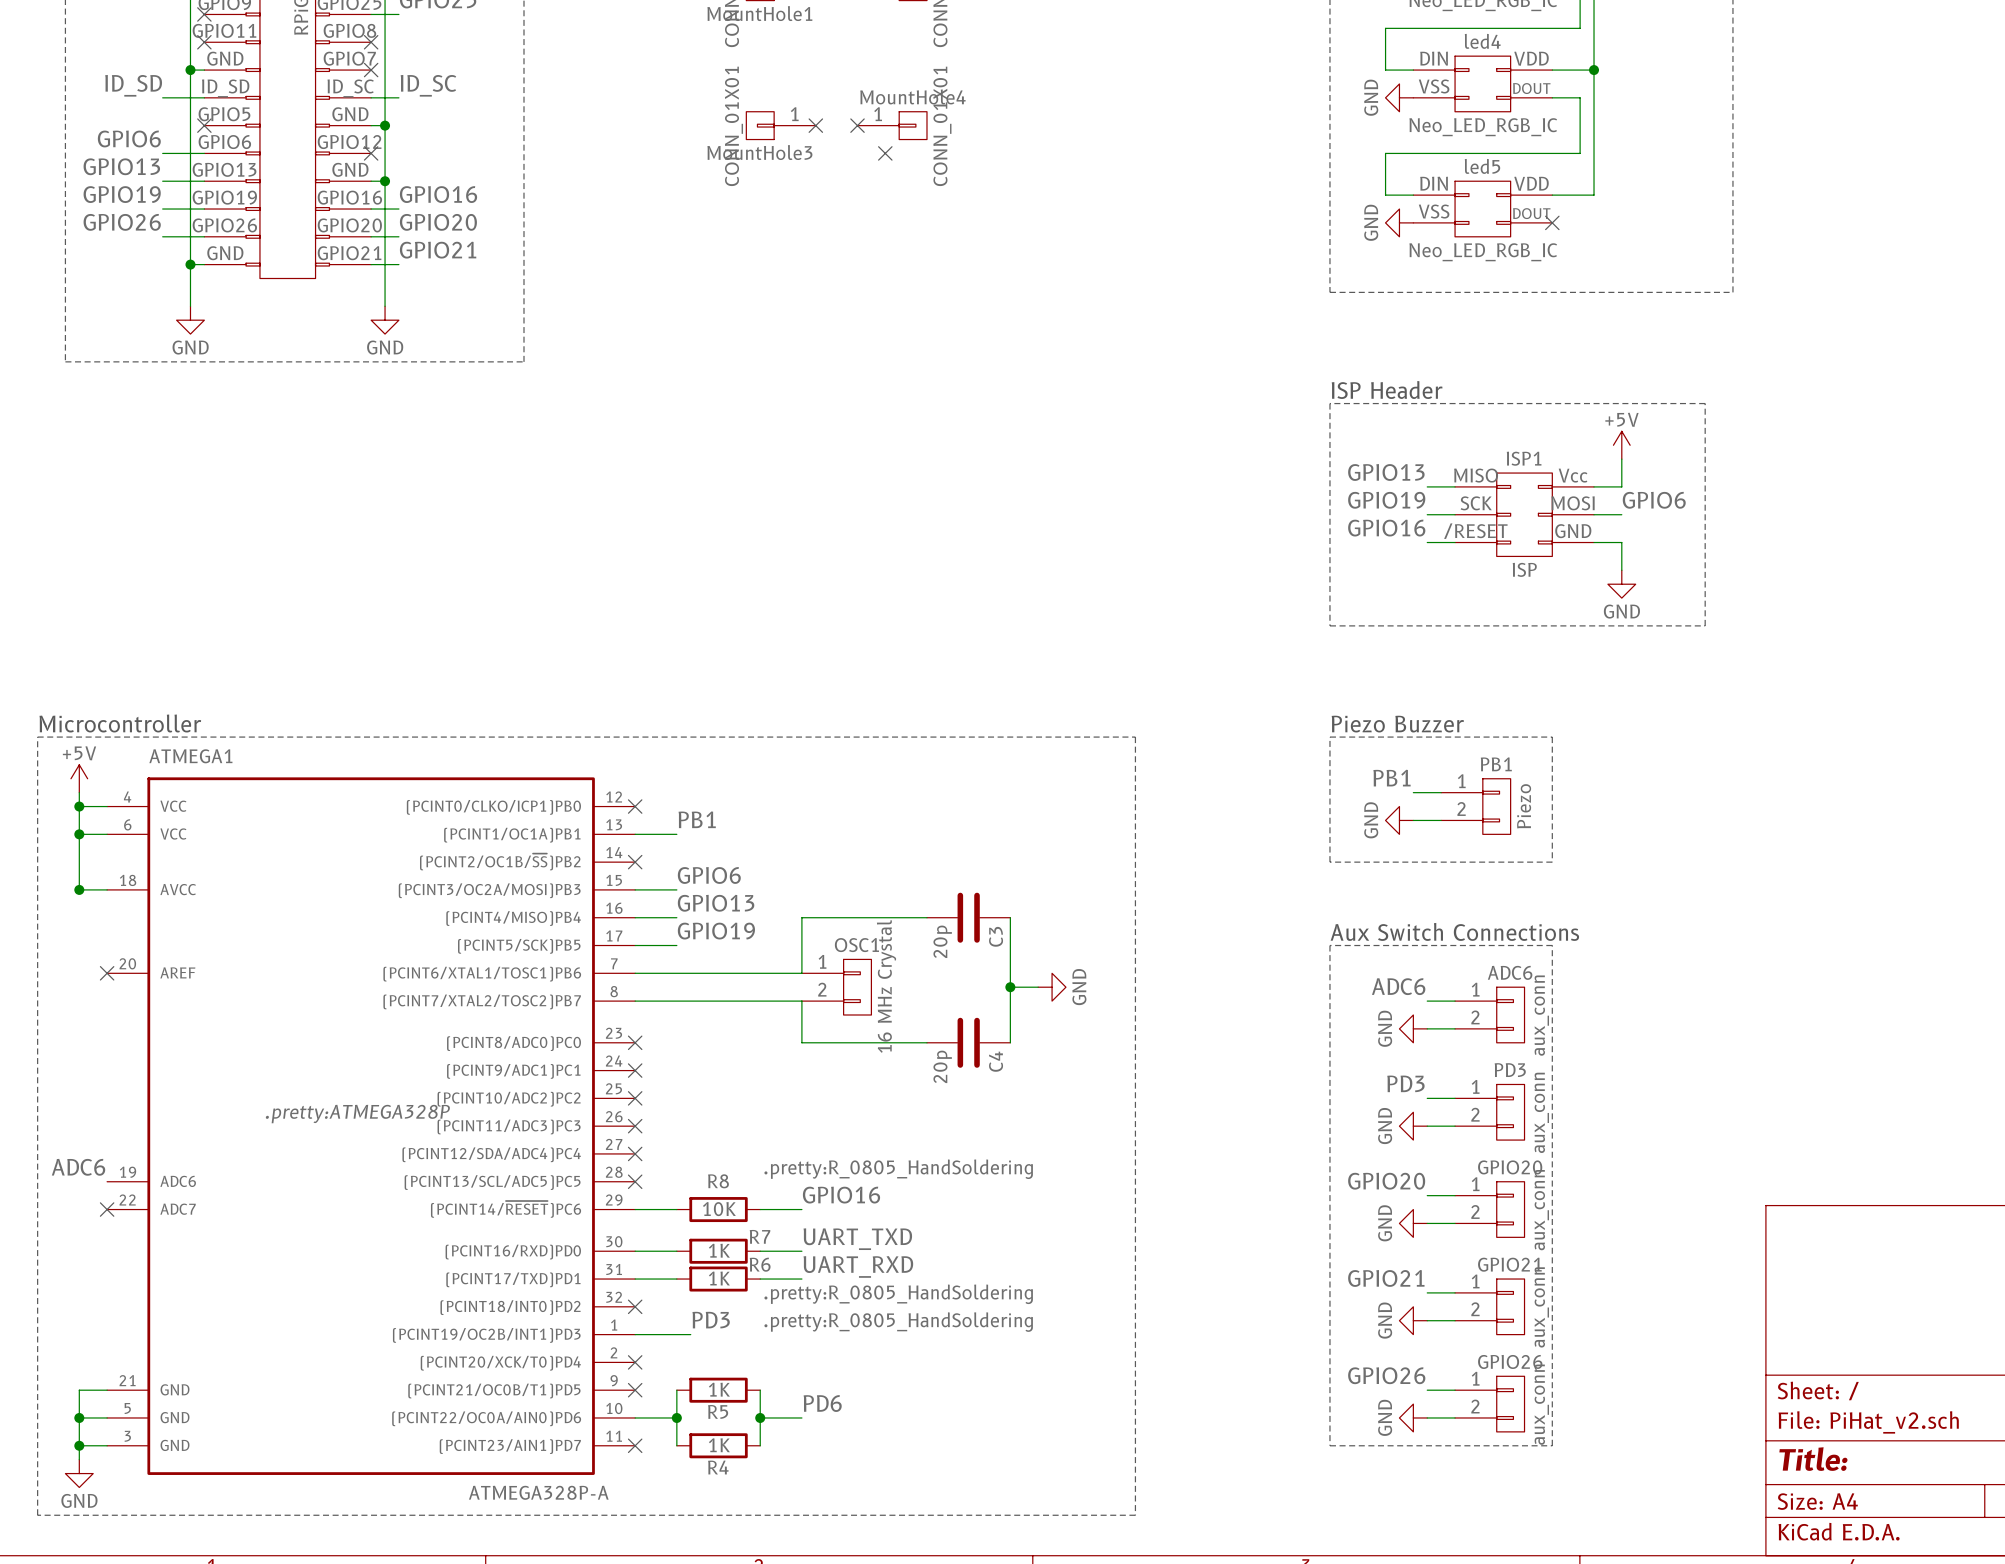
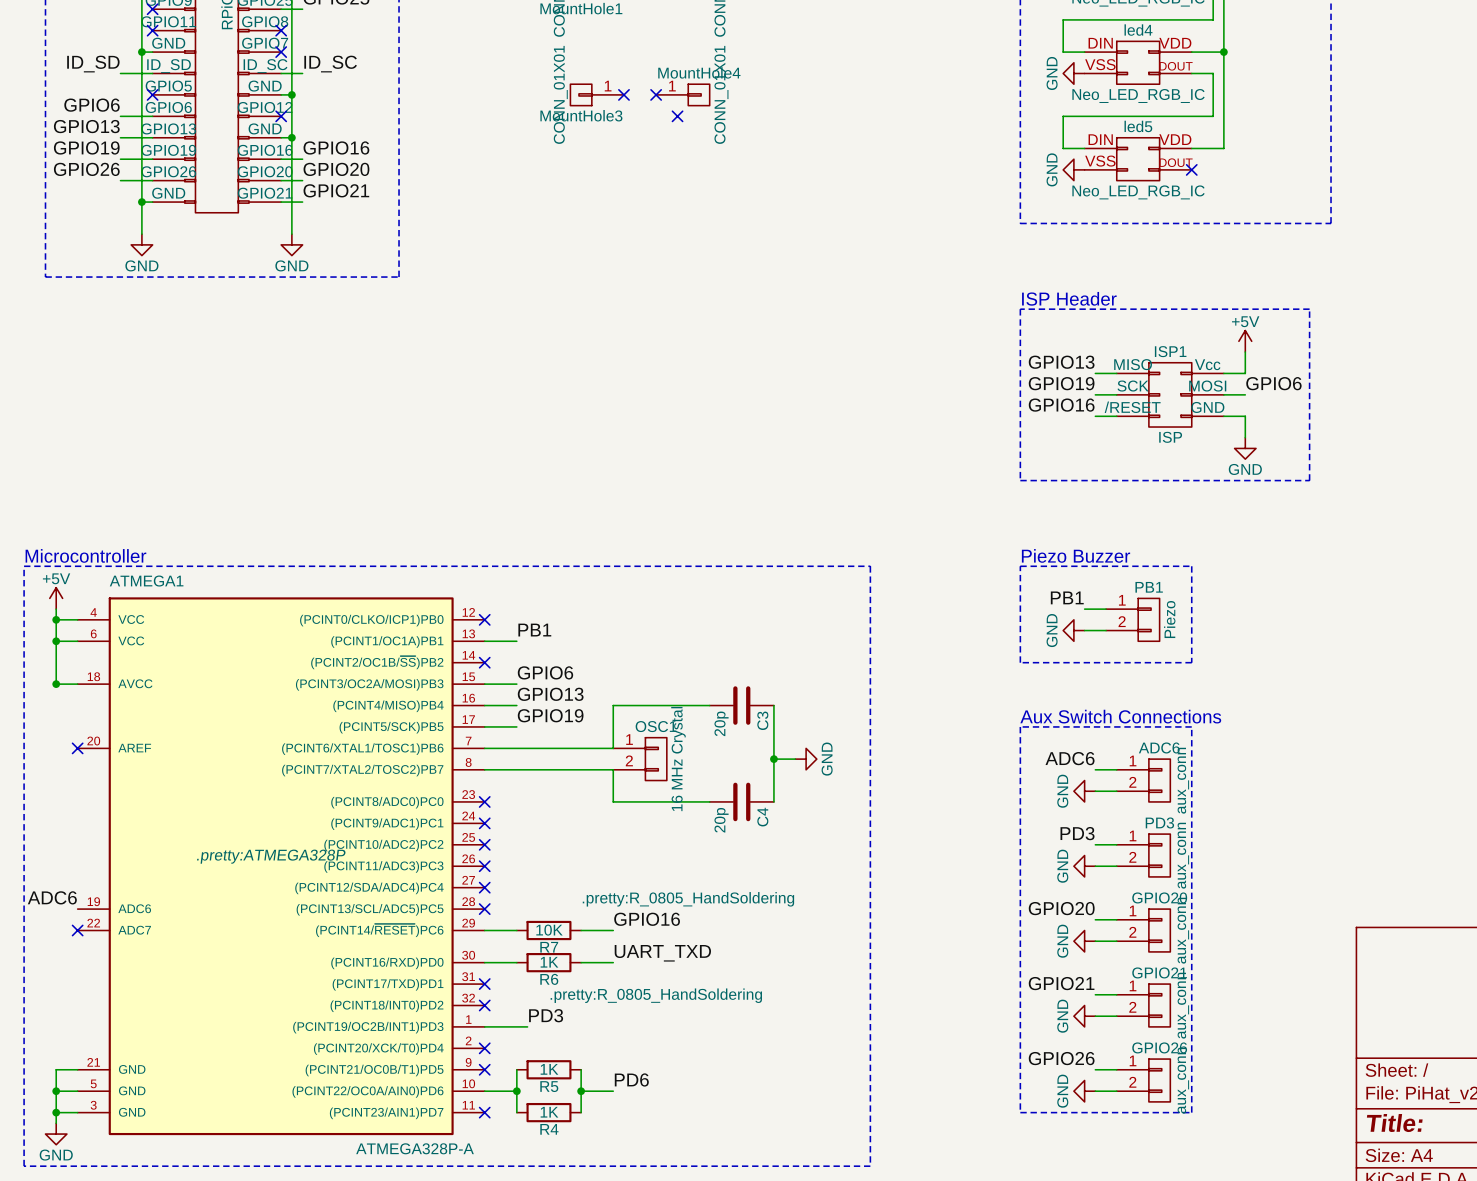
R8 name: R8 (718, 1181) -> R7 (549, 947)
R7 name: R7 (760, 1236) -> R6 (549, 979)
label: UART_RXD (858, 1266) -> none
wire: (635, 1279) (676, 1279) -> none
no-connect mark: none -> (484, 984)
R6: 1K (718, 1279) -> none
wire: (760, 1279) (801, 1279) -> none
R7 text position: .pretty:R_0805_HandSoldering (898, 1294) -> .pretty:R_0805_HandSoldering (656, 995)

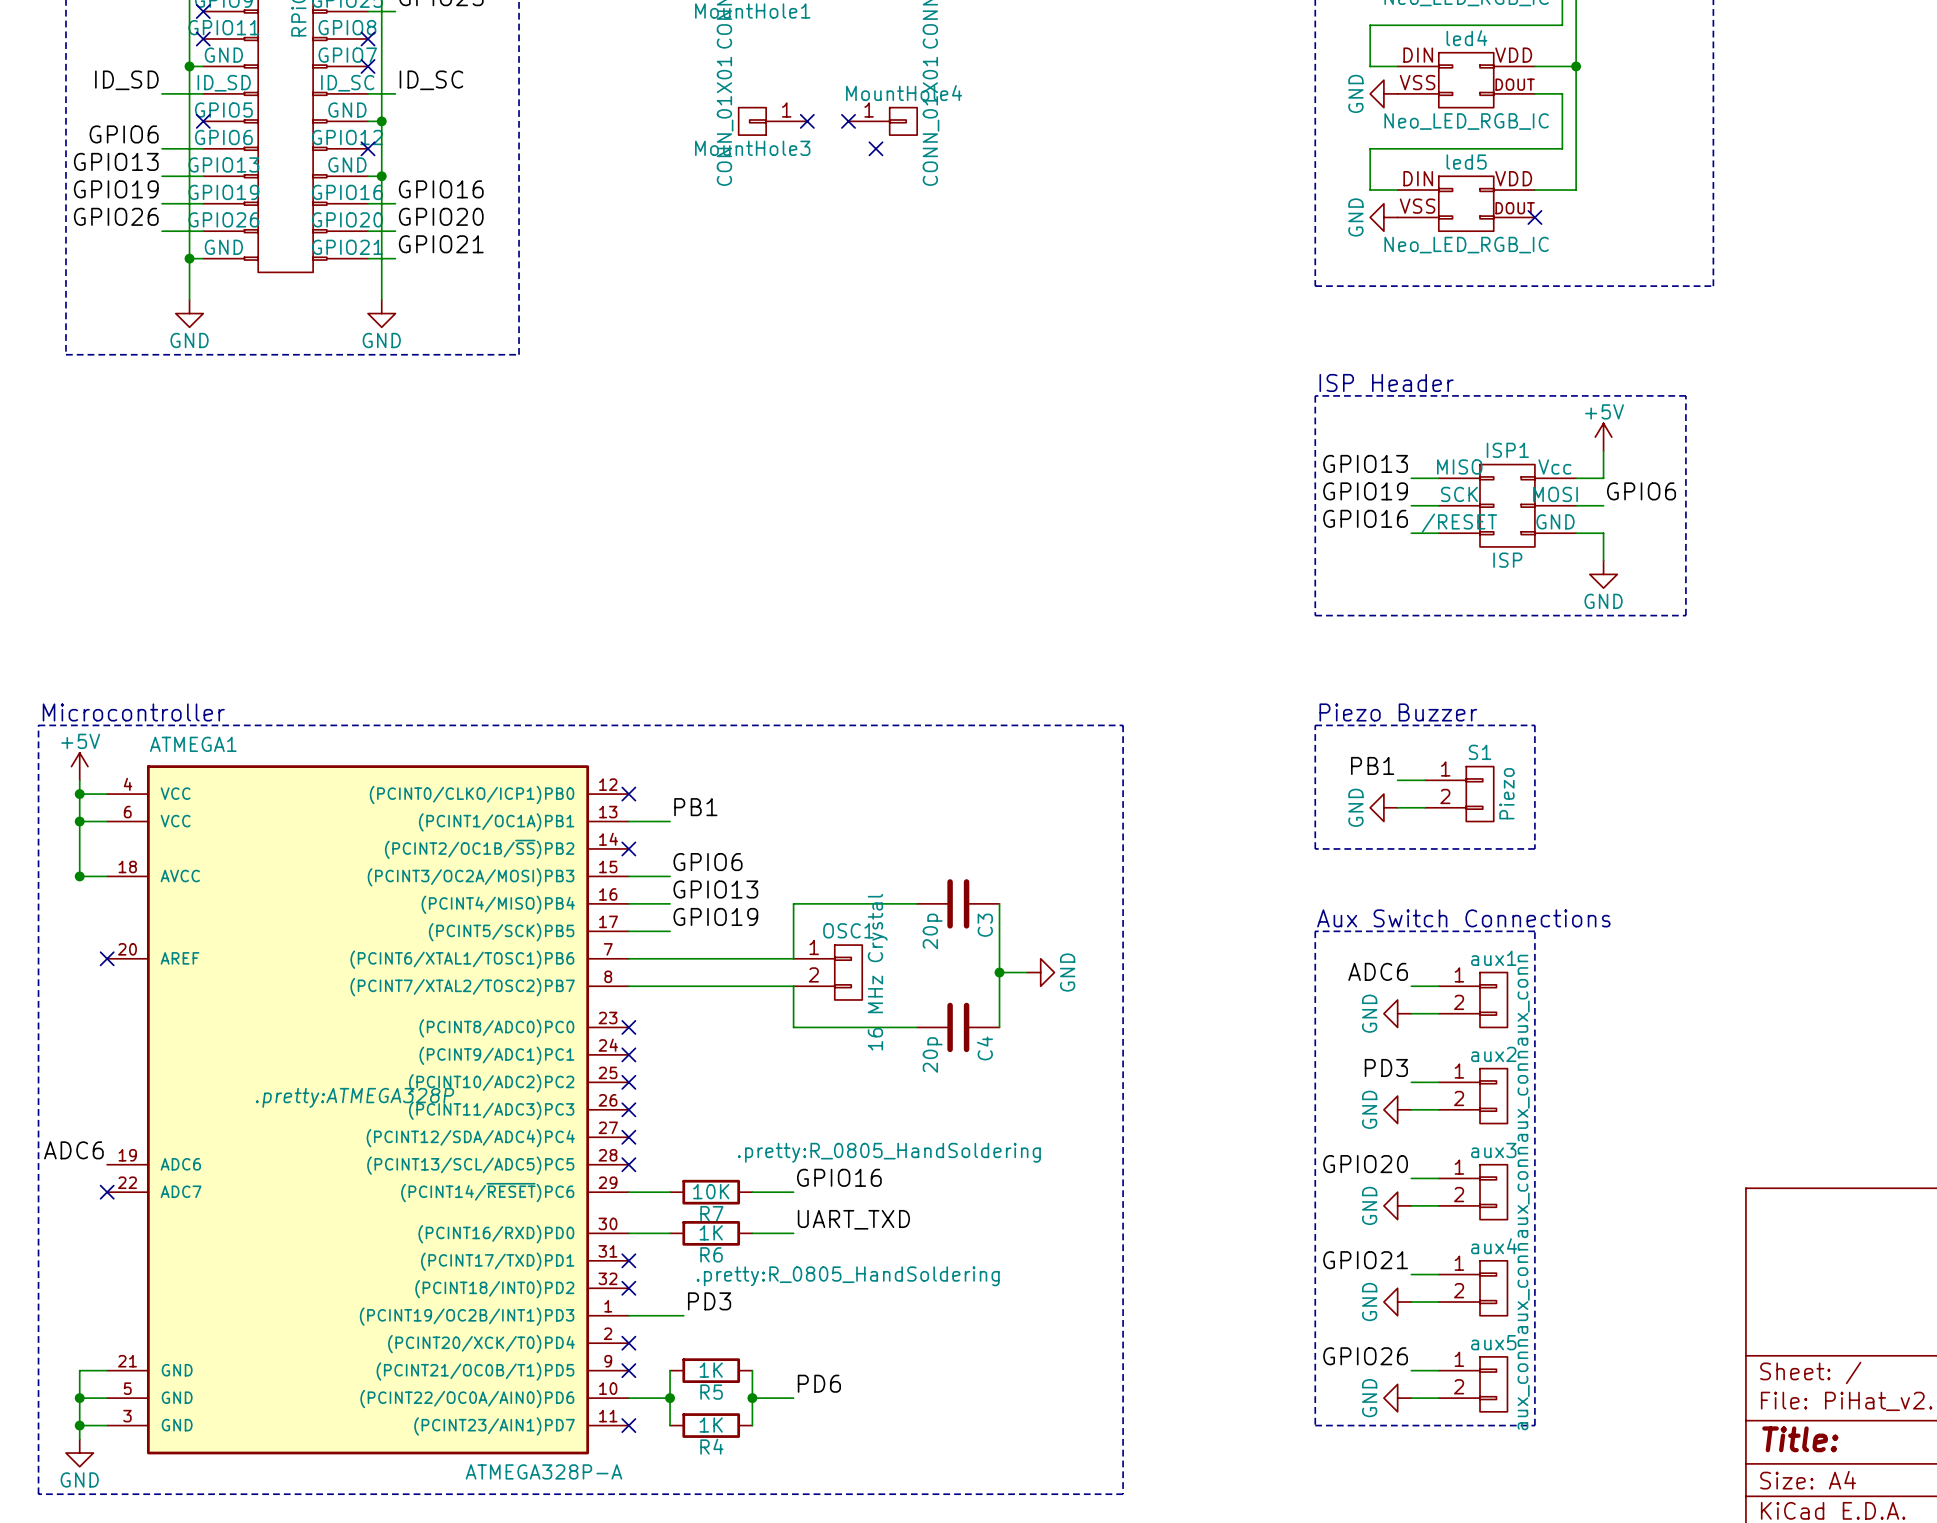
PB1 name: PB1 (1149, 587) -> S1 (1480, 752)
ADC6 name: ADC6 (1159, 747) -> aux1 (1493, 958)
PD3 name: PD3 (1159, 822) -> aux2 (1493, 1054)
GPIO20 name: GPIO20 (1159, 897) -> aux3 (1493, 1150)
GPIO21 name: GPIO21 (1159, 972) -> aux4 (1494, 1246)
GPIO26 name: GPIO26 (1159, 1047) -> aux5 (1493, 1342)

